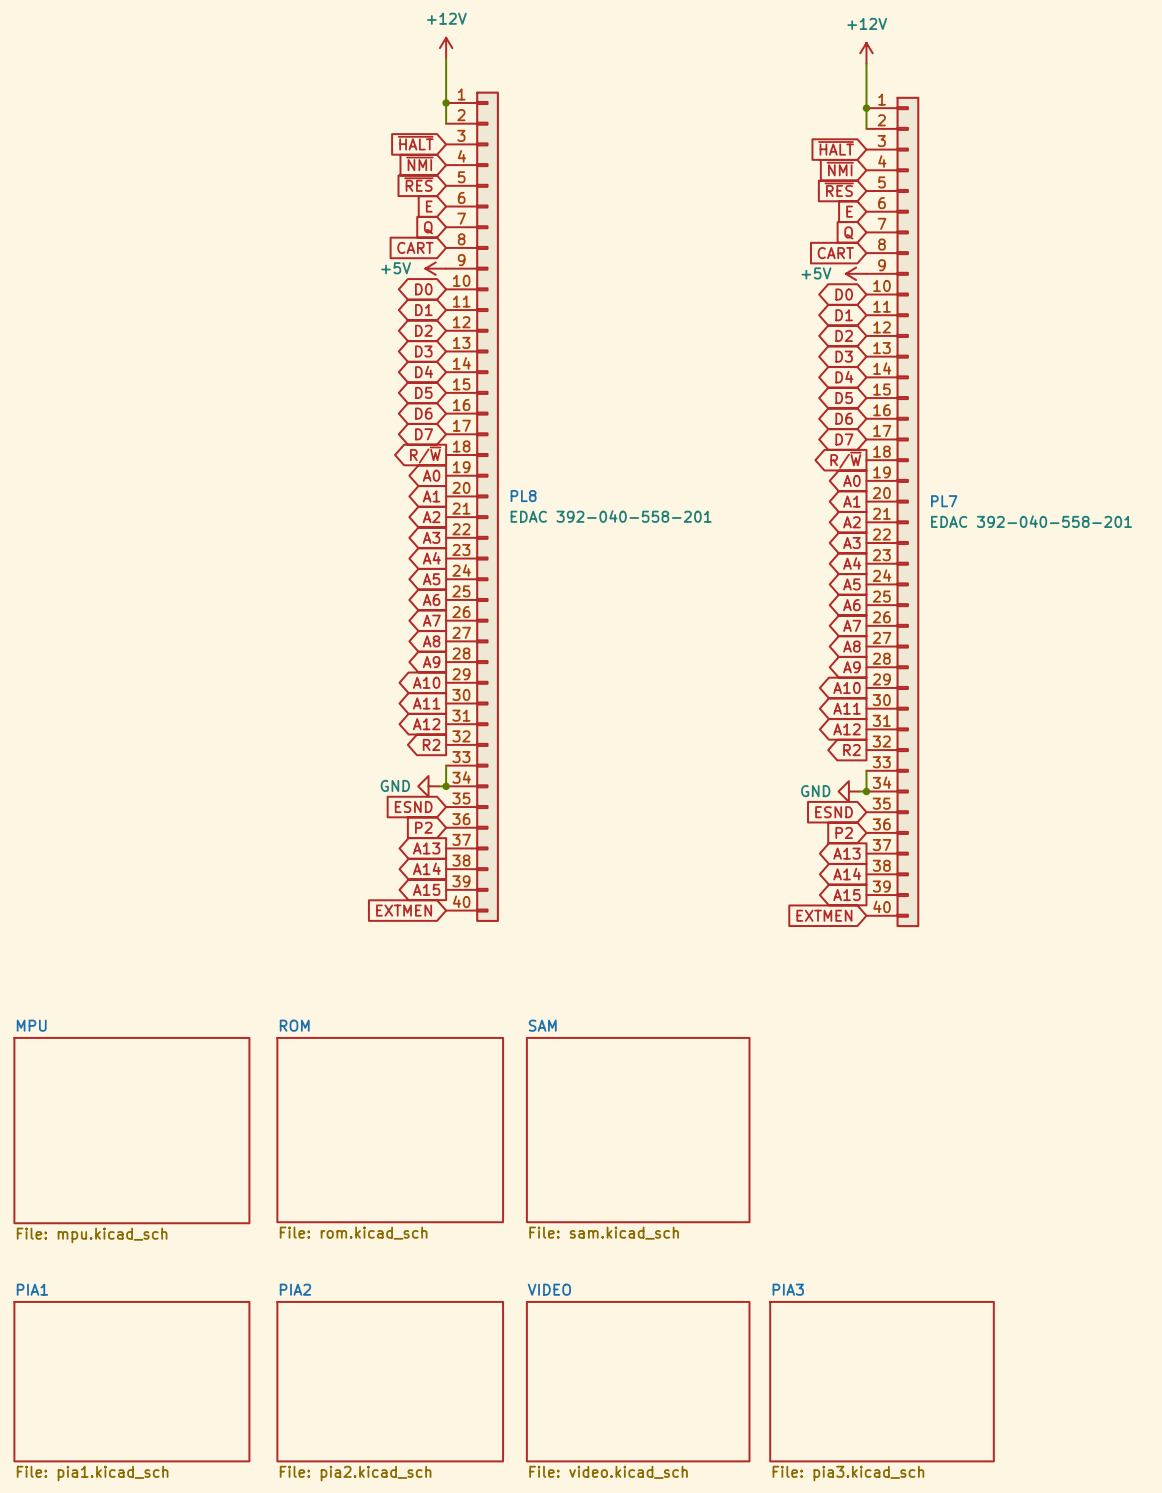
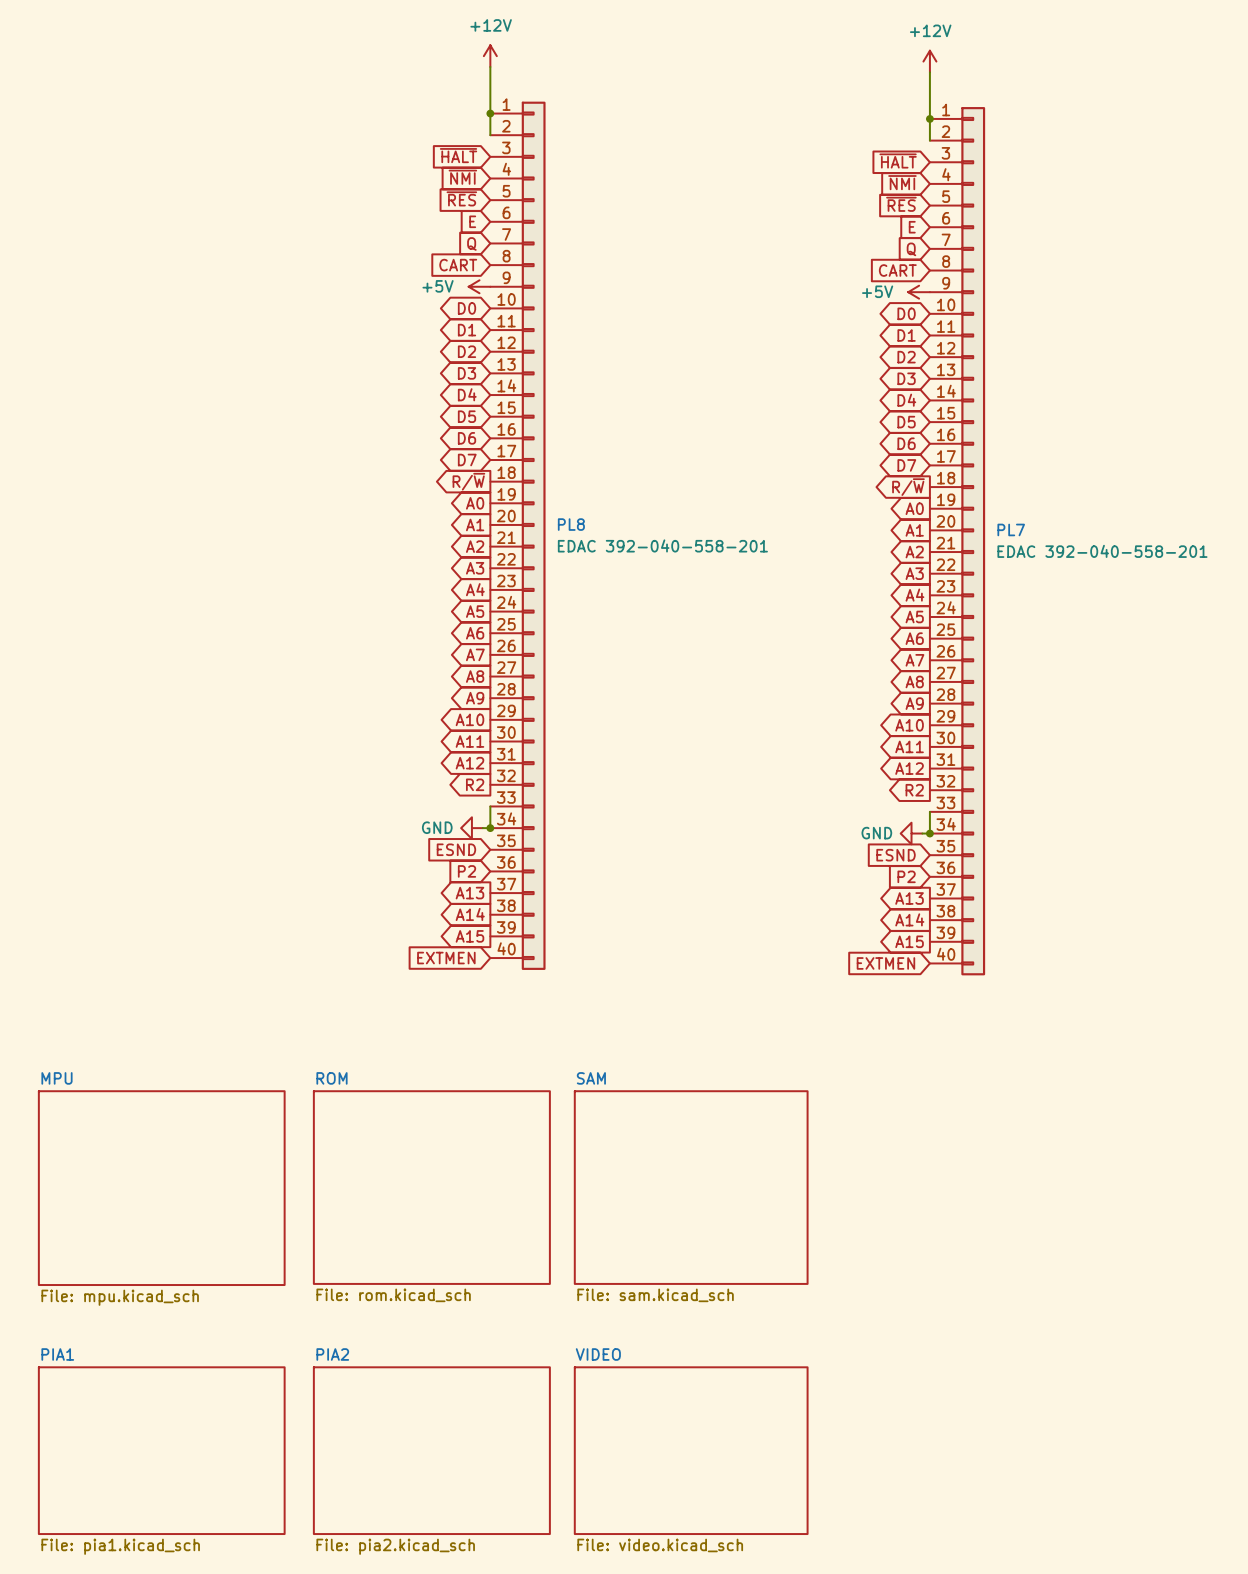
sheet PIA3: File: pia3.kicad_sch (882, 1381) -> none

